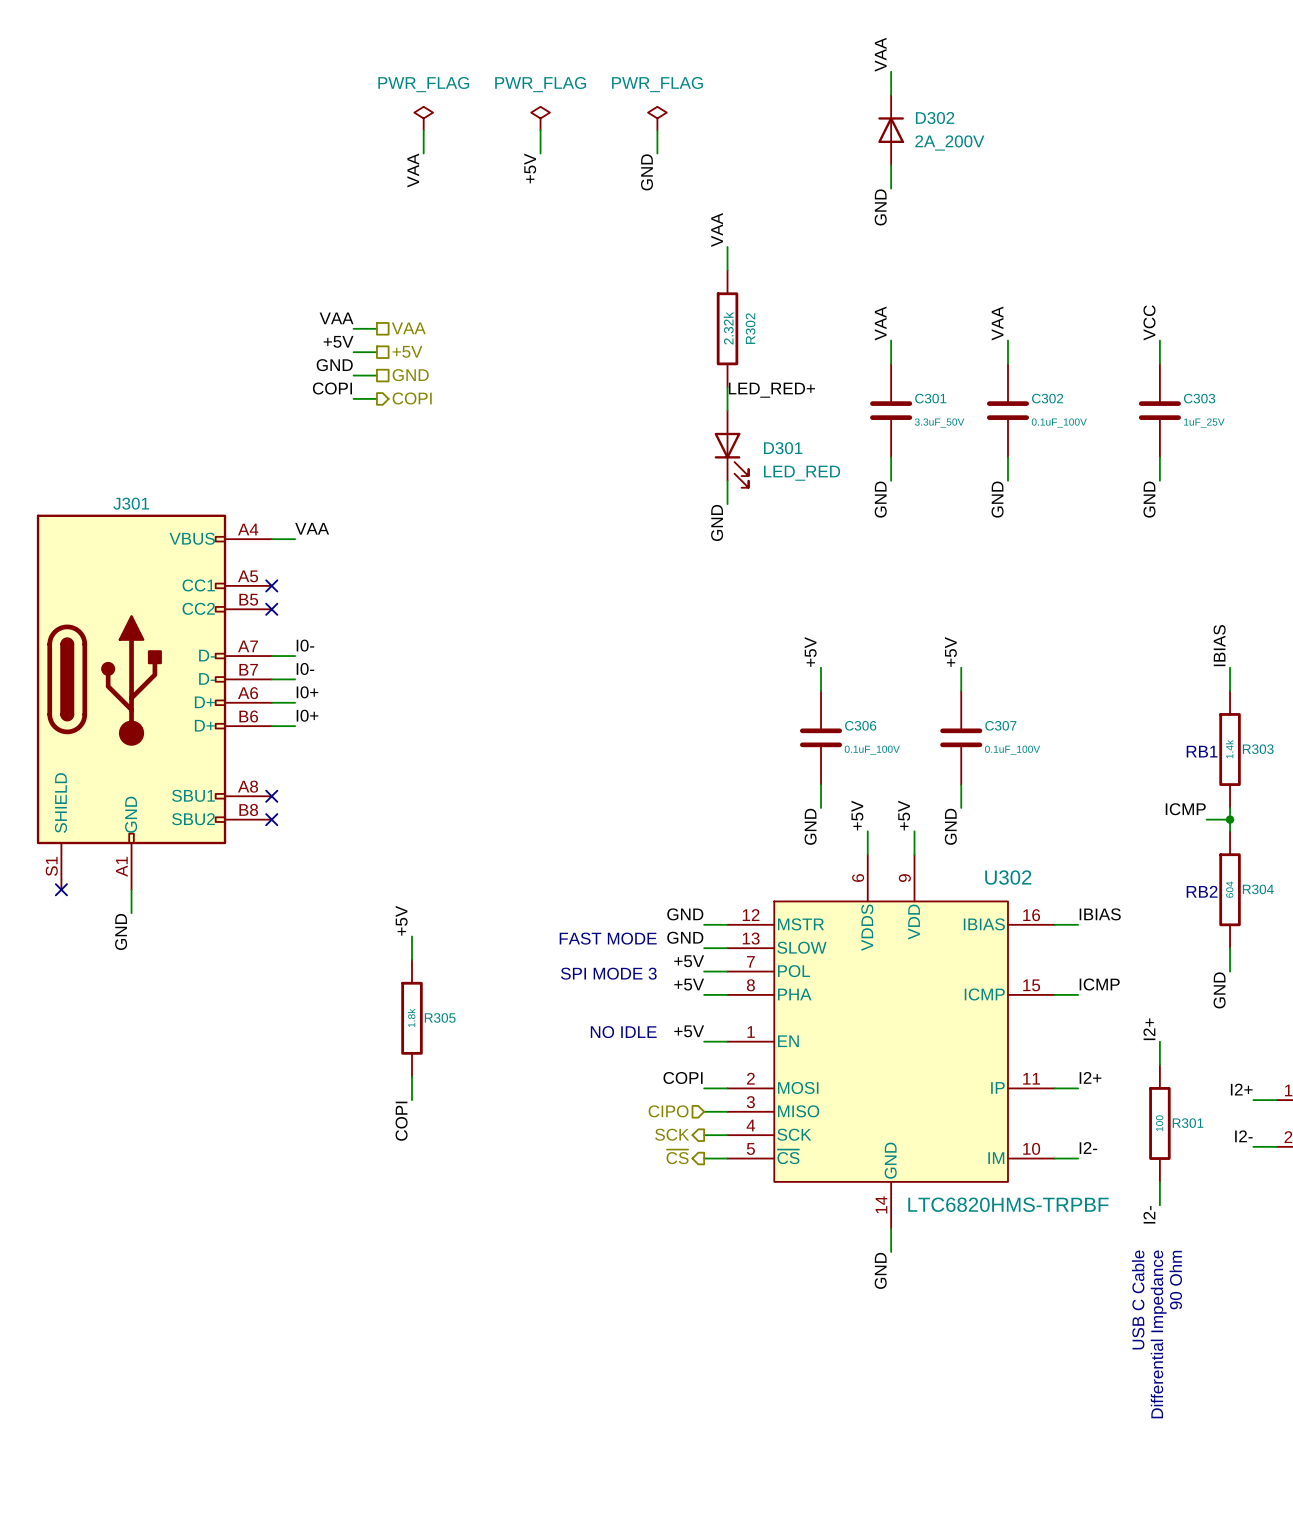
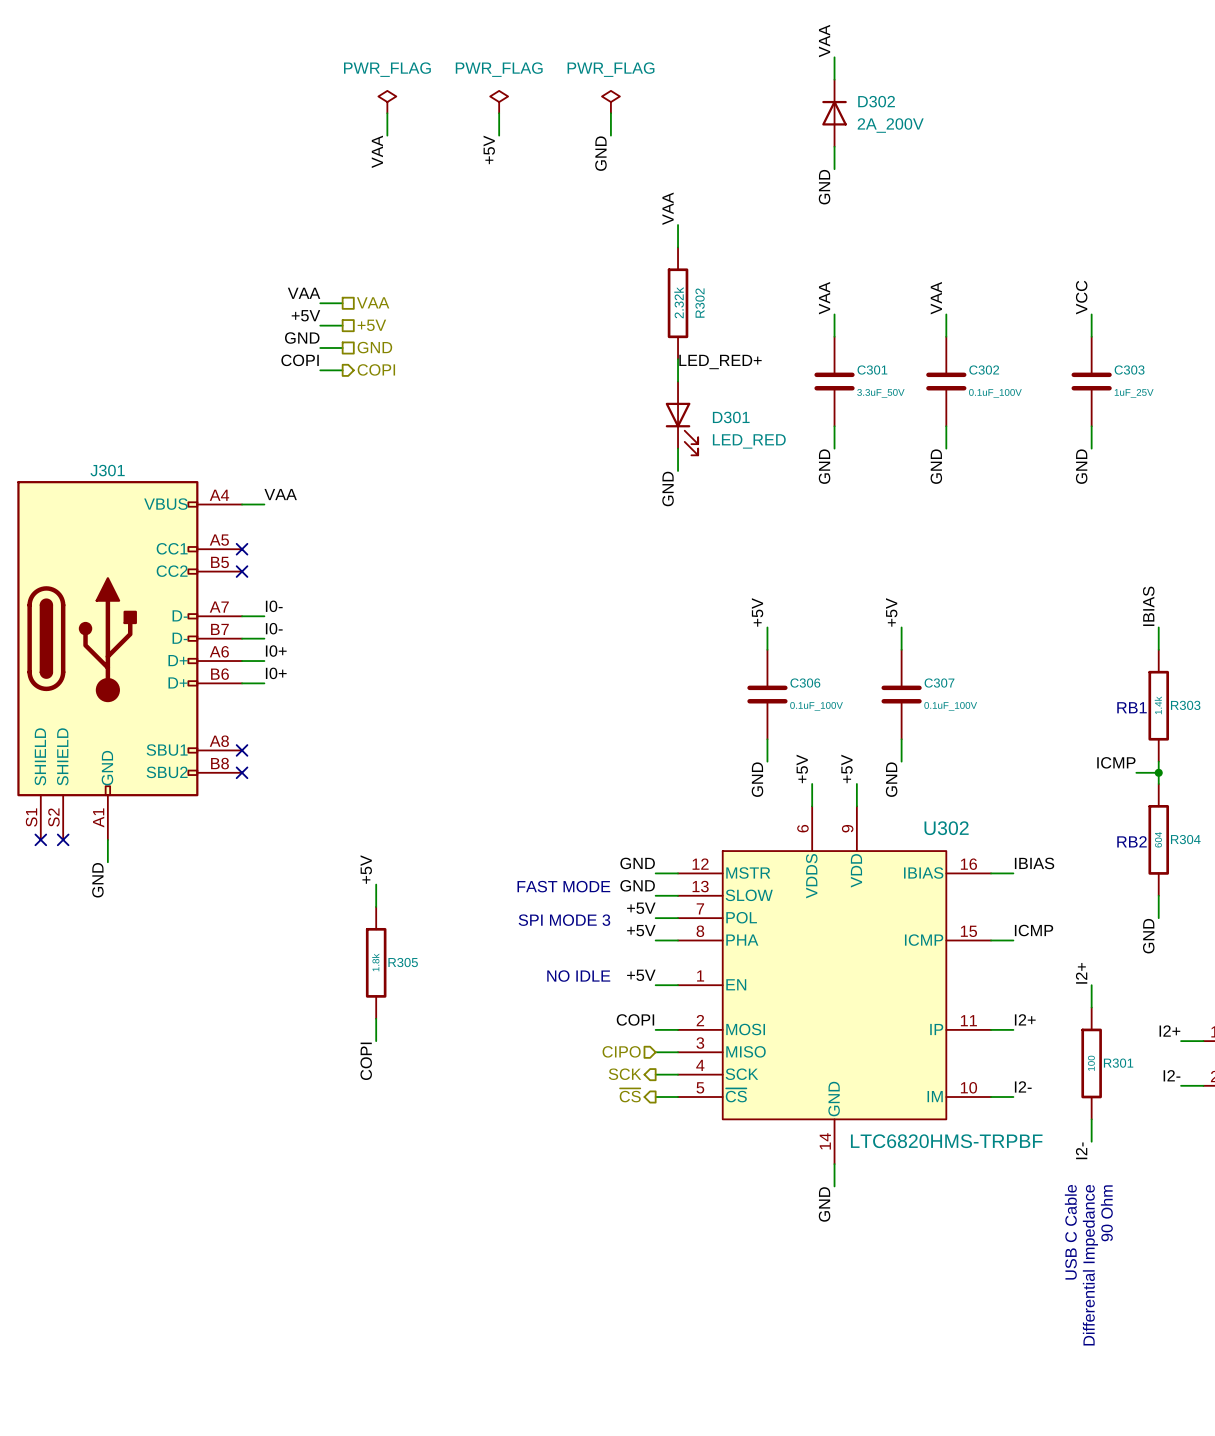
J301 symbol: [36, 514, 272, 890] -> [17, 481, 243, 840]
no-connect mark: none -> (63, 839)

